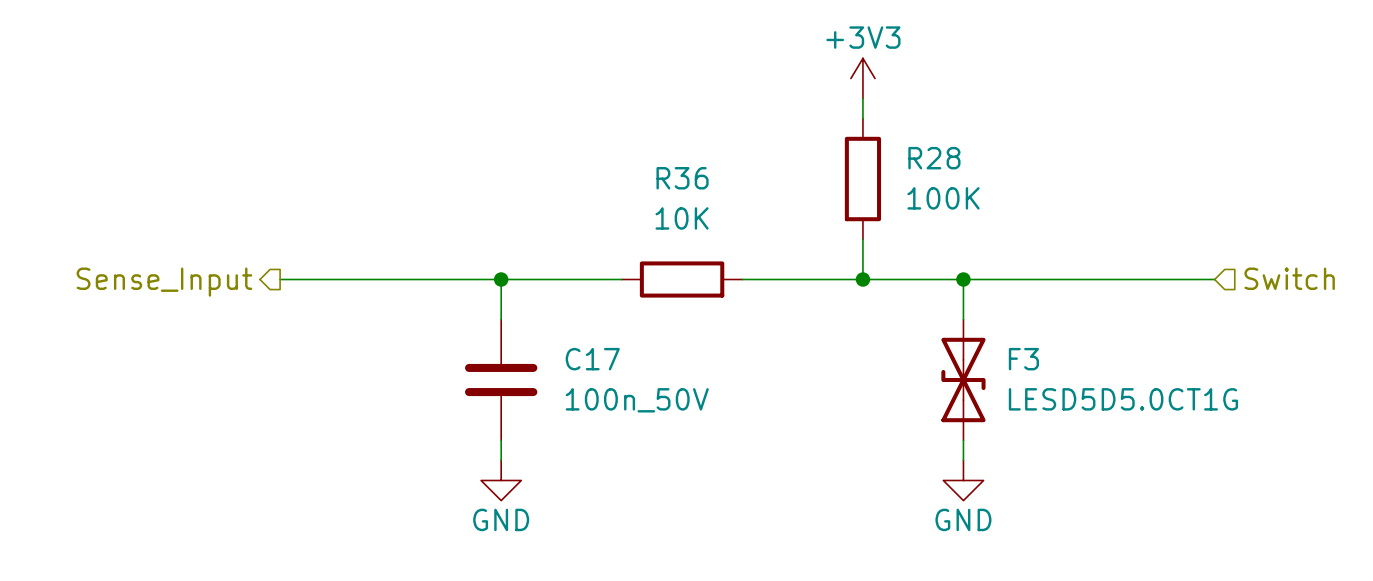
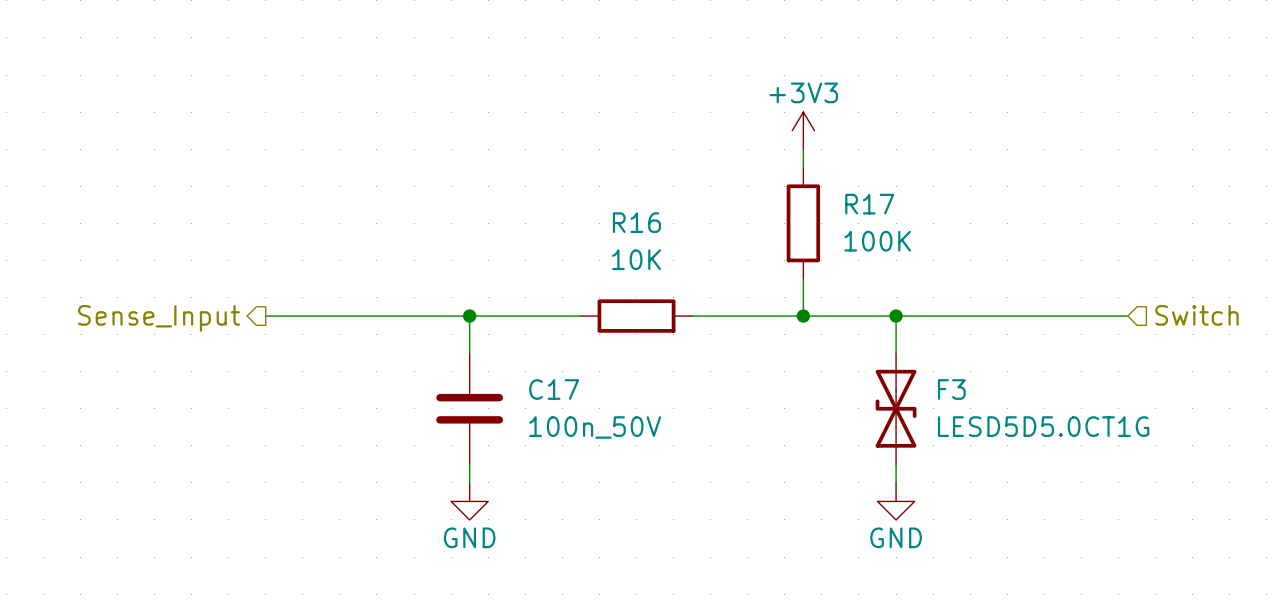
R28 name: R28 (934, 158) -> R17 (869, 204)
R36 name: R36 (682, 178) -> R16 (636, 222)

